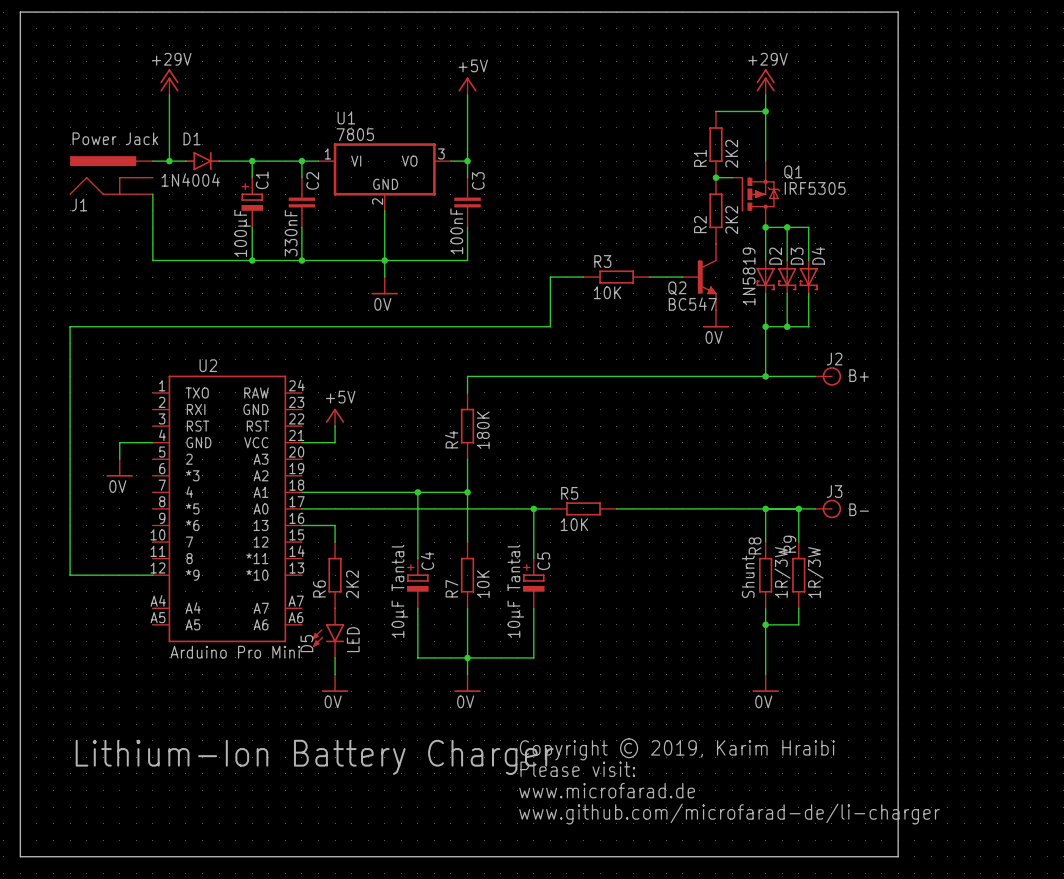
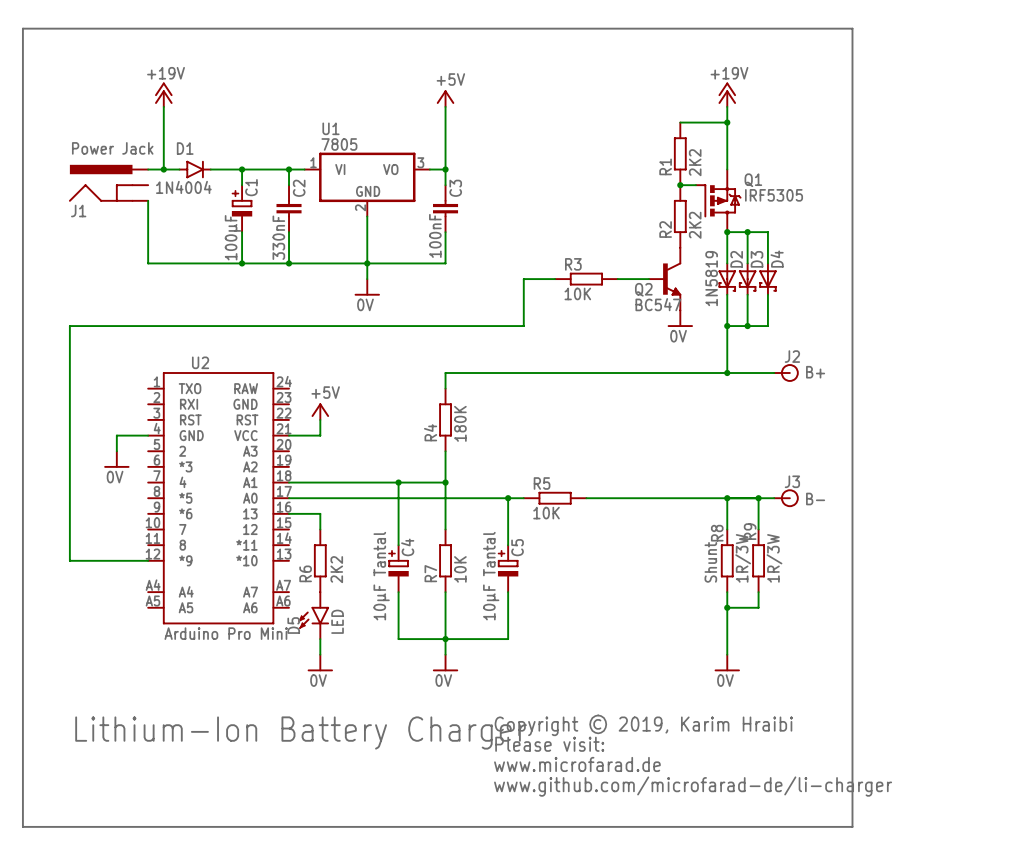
power symbol: +29V (169, 82) -> +19V (163, 94)
power symbol: +29V (765, 82) -> +19V (727, 94)

